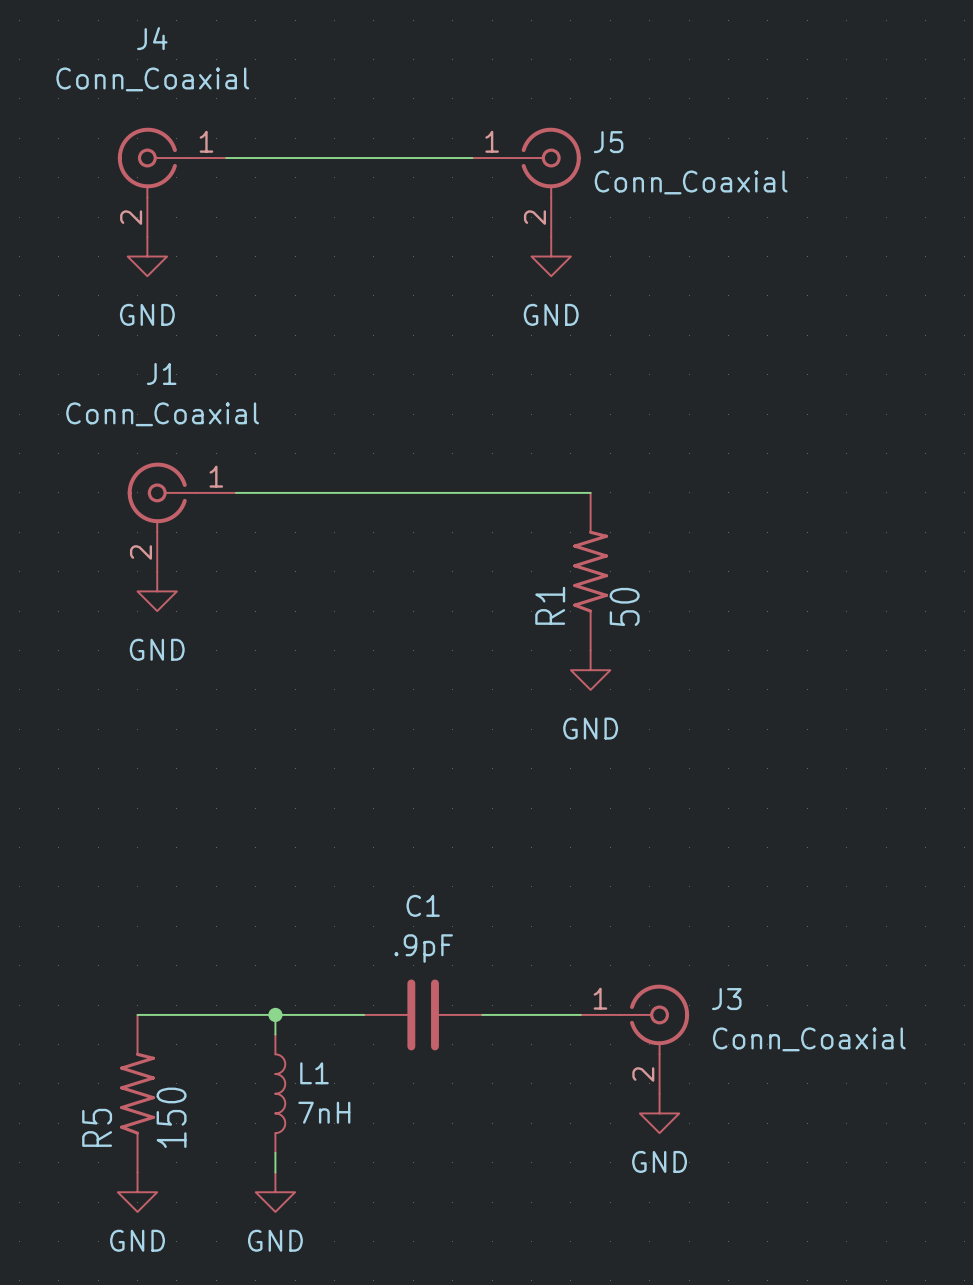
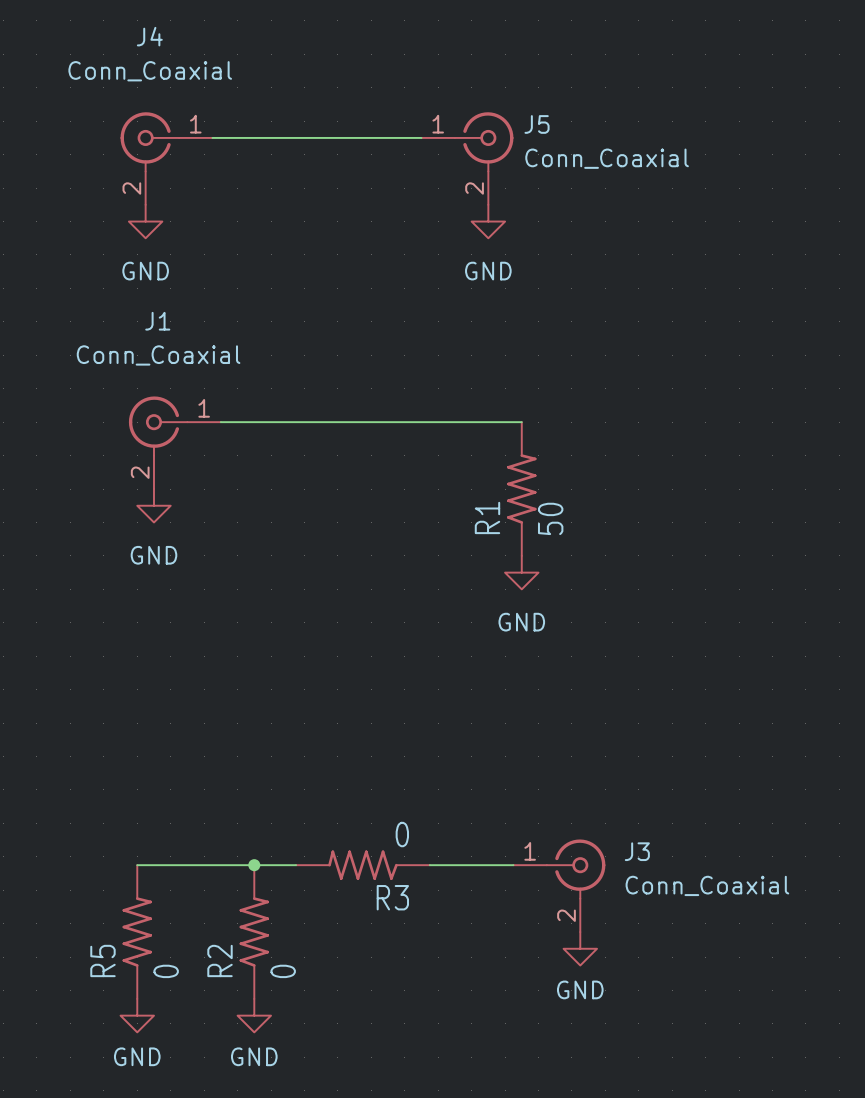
R3: none -> 0 (362, 865)
C1: .9pF (423, 1014) -> none
R2: none -> 0 (254, 932)
L1: 7nH (280, 1093) -> none
R5 value: 150 (171, 1117) -> 0 (166, 971)

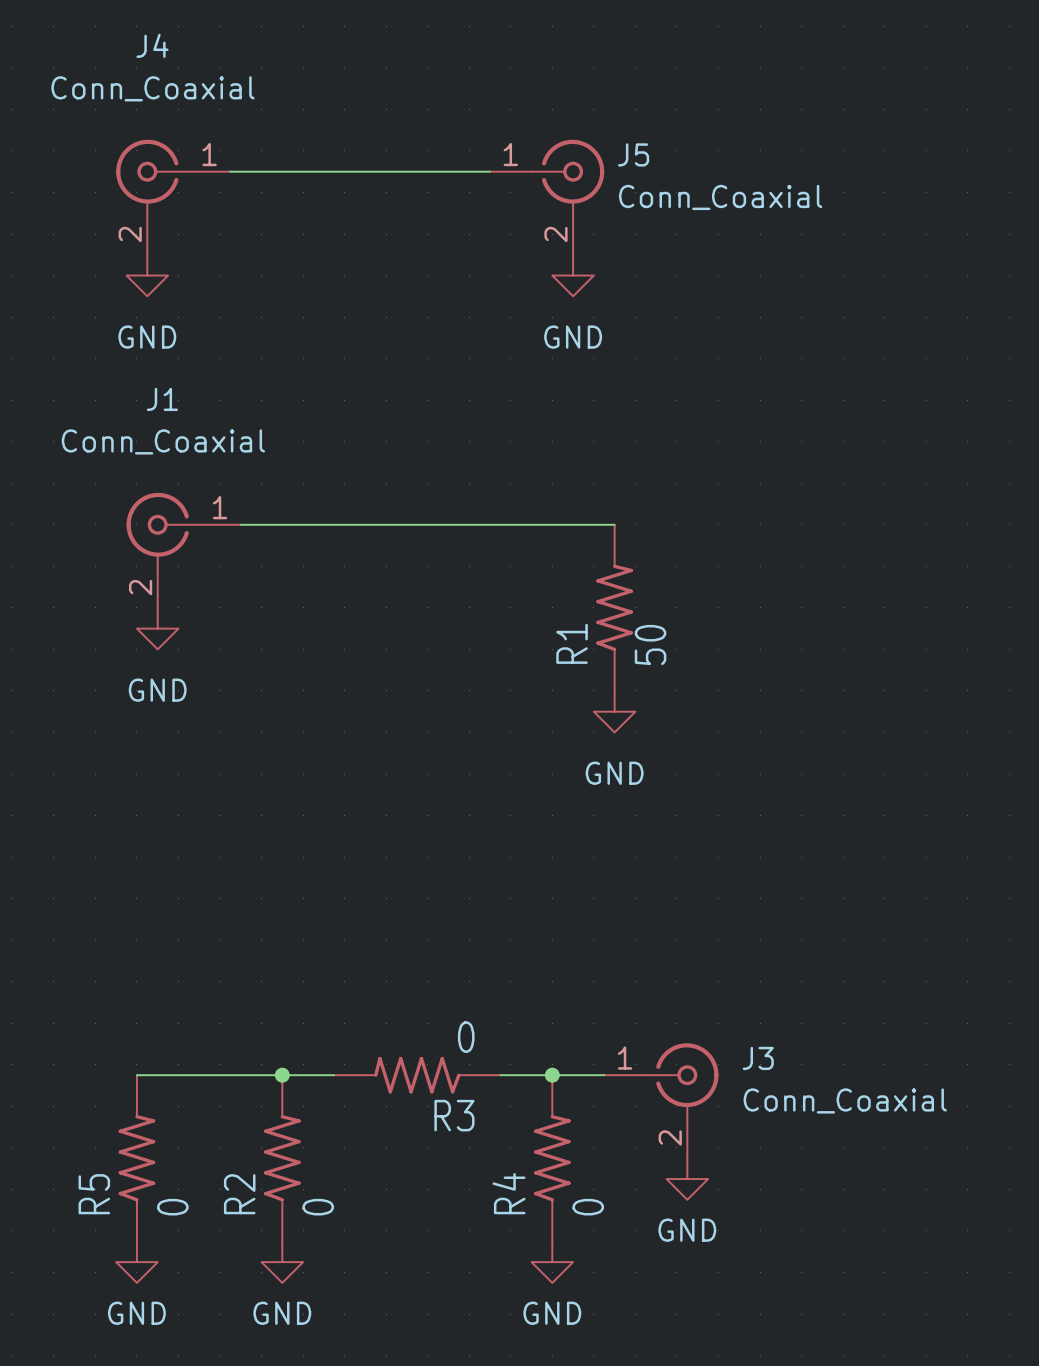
junction: none -> (552, 1075)
R4: none -> 0 (552, 1158)
power symbol: none -> GND (552, 1262)

